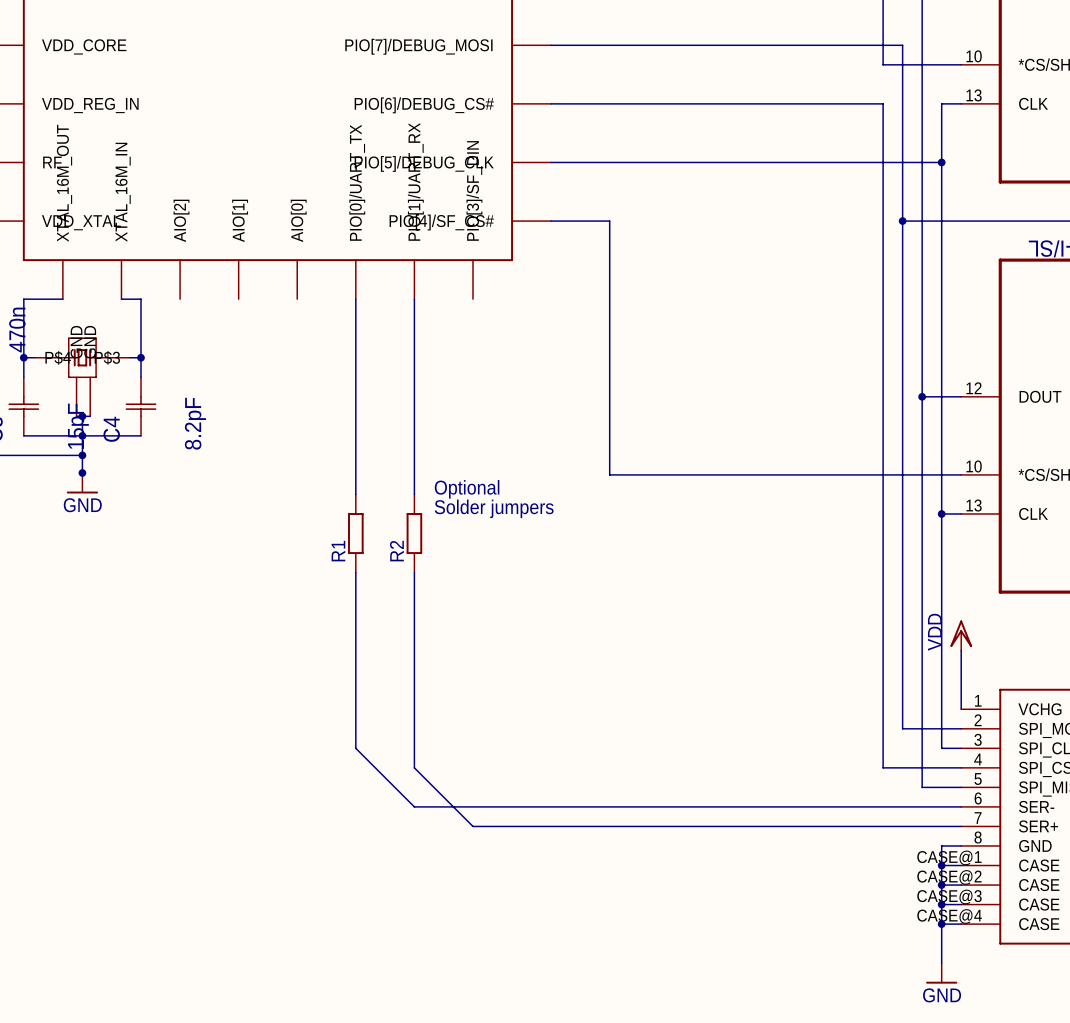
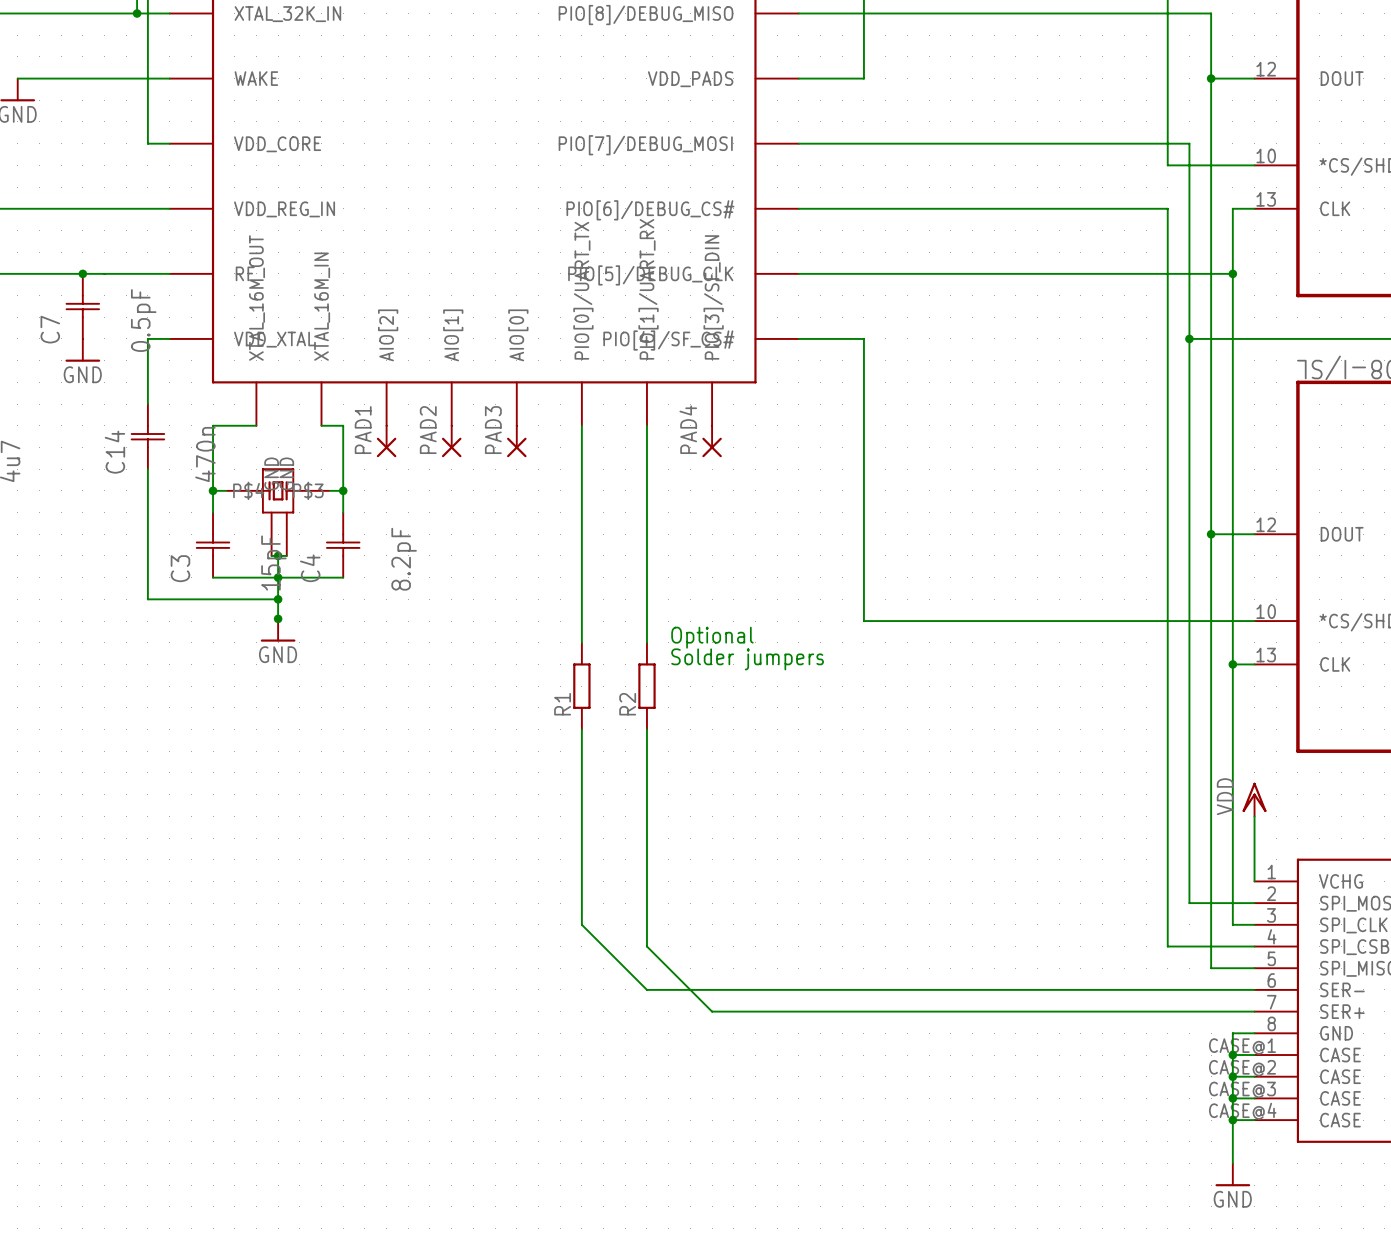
PAD1: none -> (386, 441)
PAD2: none -> (451, 441)
PAD3: none -> (516, 441)
PAD4: none -> (712, 441)

